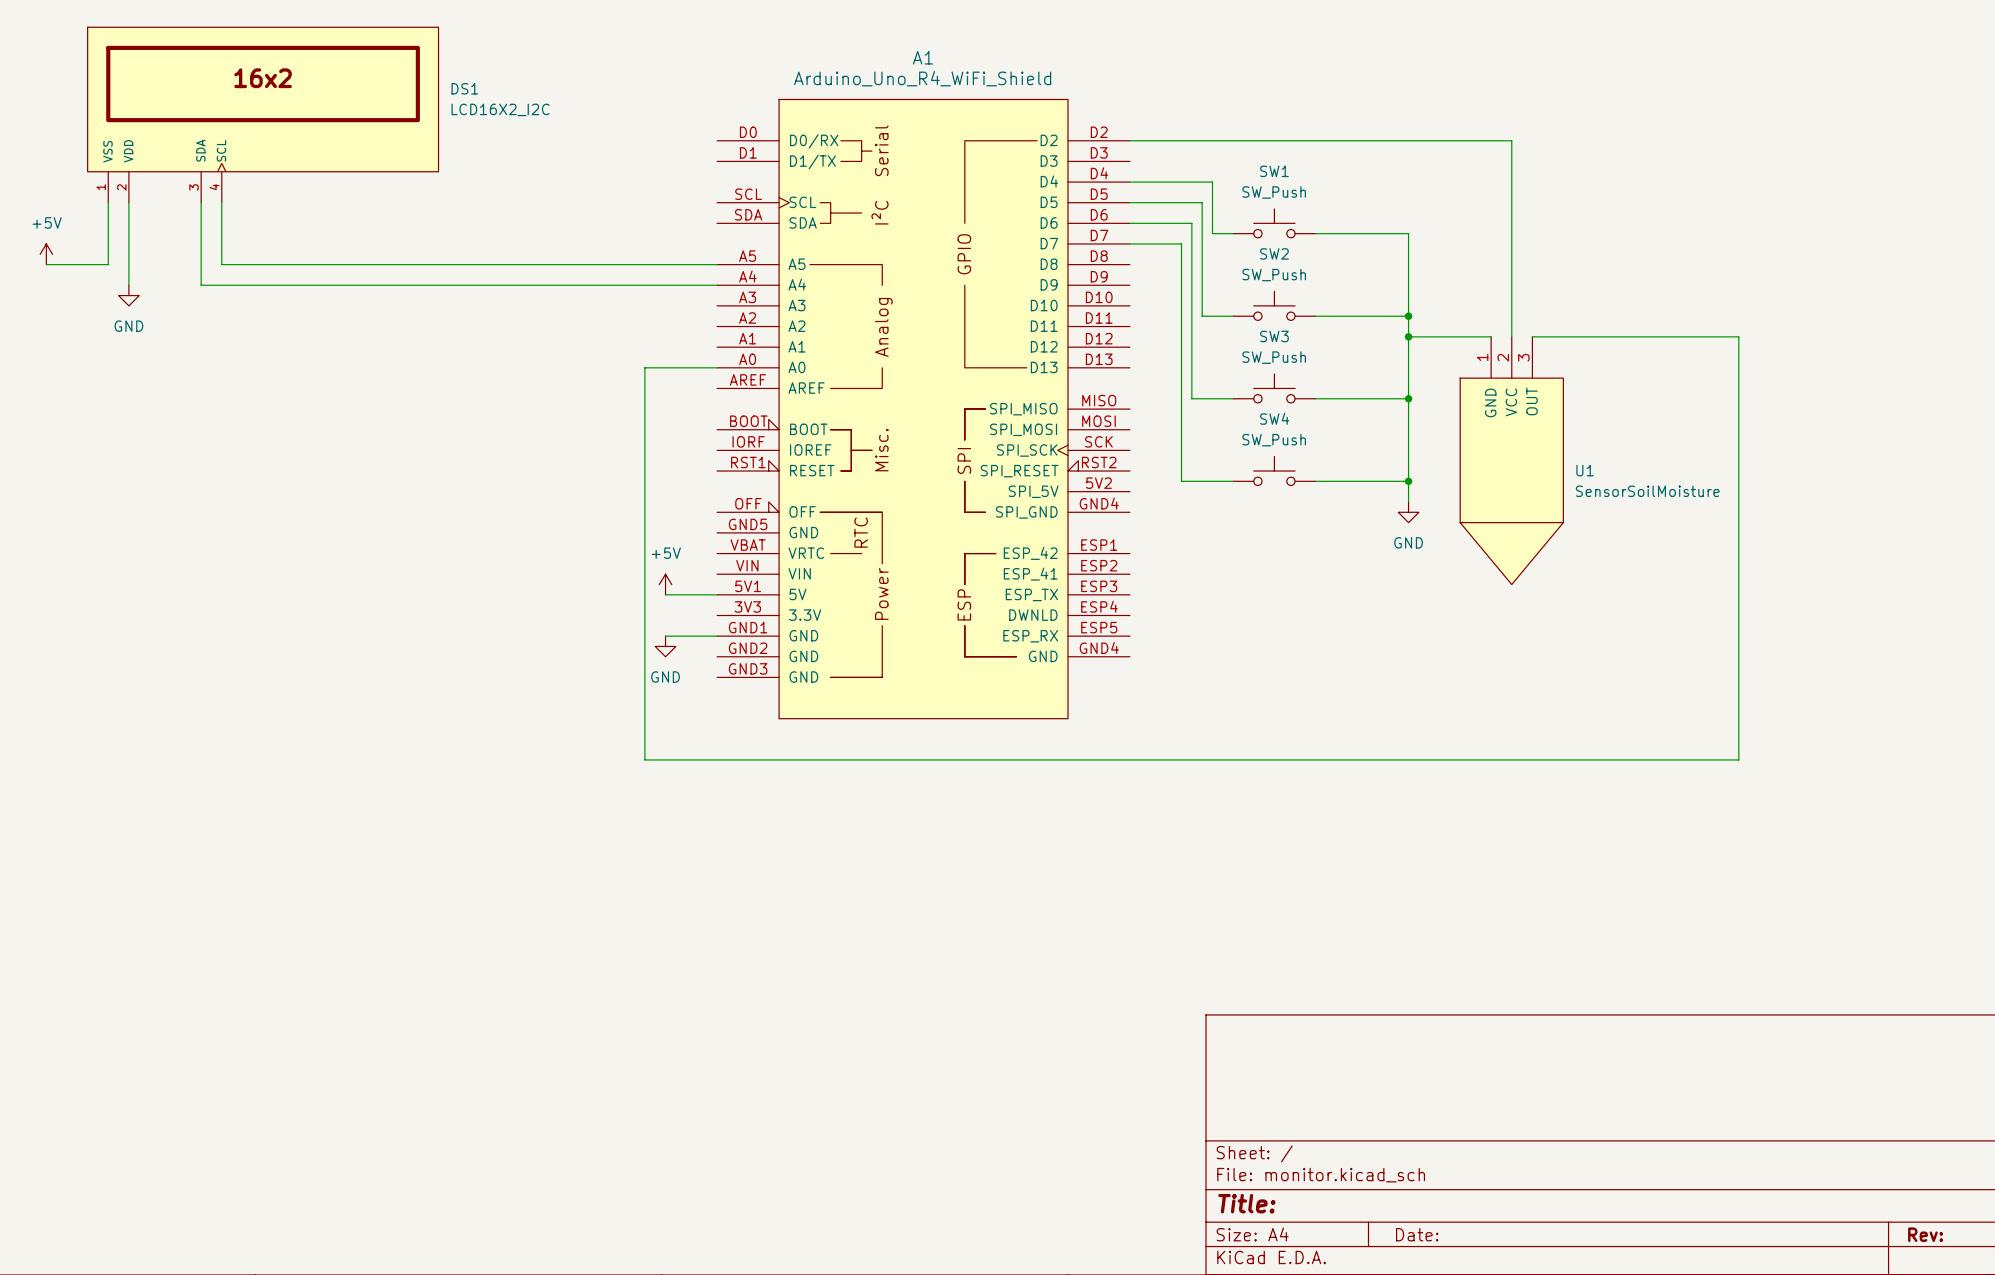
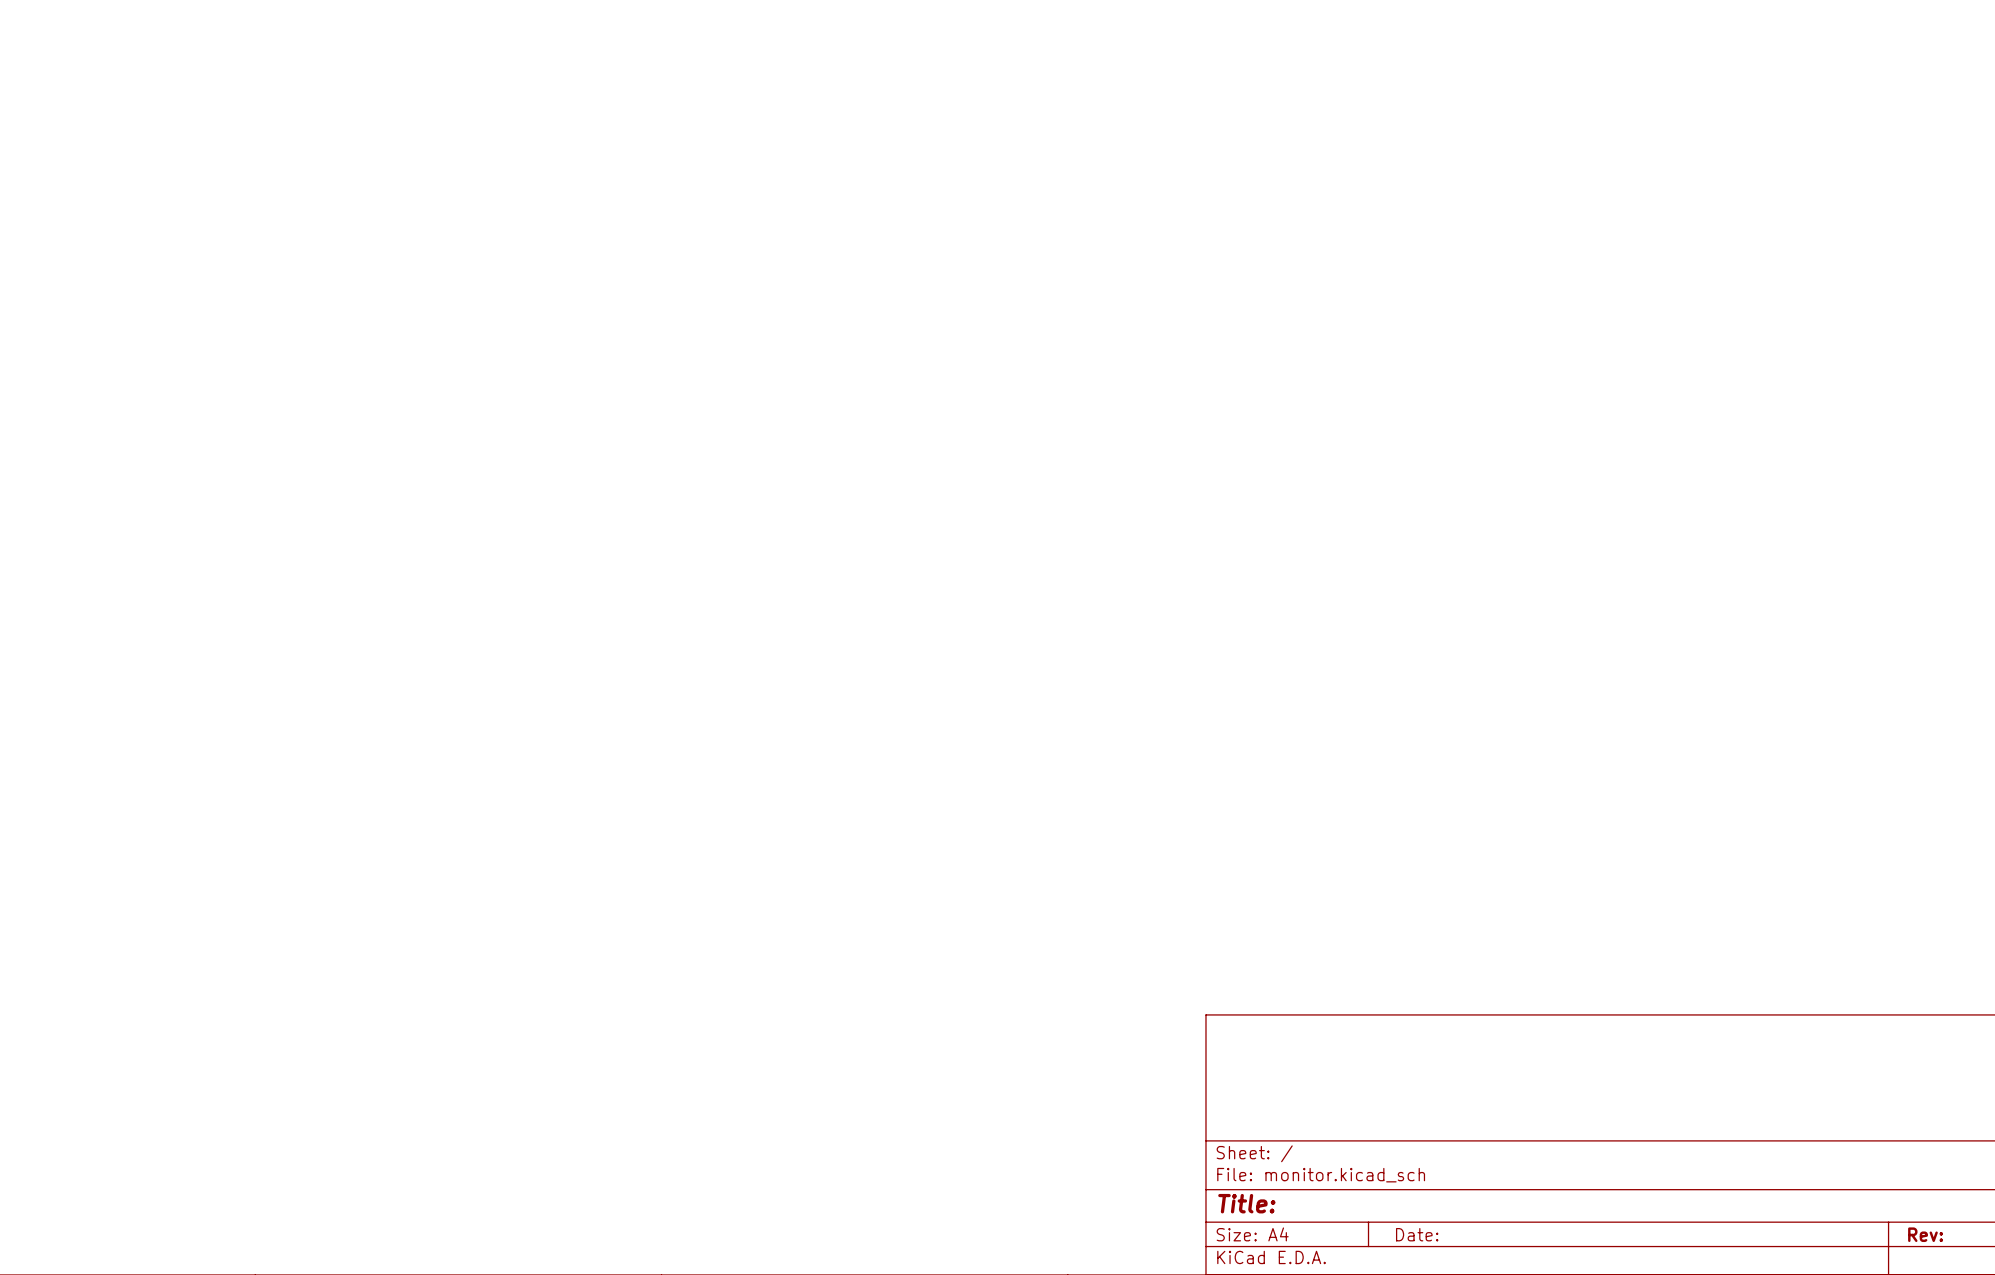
DS1: LCD16X2_I2C (263, 114) -> none
wire: (1129, 140) (1511, 140) (1511, 336) -> none
wire: (1129, 182) (1212, 182) (1212, 233) (1233, 233) -> none
wire: (108, 202) (108, 264) (46, 264) -> none
wire: (128, 202) (128, 285) -> none
wire: (201, 202) (201, 285) (717, 285) -> none
wire: (221, 202) (221, 264) (717, 264) -> none
wire: (1129, 202) (1202, 202) (1202, 316) (1233, 316) -> none
wire: (1129, 223) (1191, 223) (1191, 398) (1233, 398) -> none
SW1: SW_Push (1274, 223) -> none
wire: (1315, 233) (1408, 233) (1408, 501) -> none
wire: (1129, 243) (1181, 243) (1181, 481) (1233, 481) -> none
power symbol: +5V (46, 254) -> none
power symbol: GND (128, 295) -> none
SW2: SW_Push (1274, 305) -> none
wire: (1315, 316) (1408, 316) -> none
junction: (1408, 316) -> none
wire: (1408, 336) (1491, 336) -> none
junction: (1408, 336) -> none
wire: (1532, 336) (1738, 336) (1738, 759) (644, 759) (644, 367) (717, 367) -> none
SW3: SW_Push (1274, 388) -> none
wire: (1315, 398) (1408, 398) -> none
junction: (1408, 398) -> none
A1: Arduino_Uno_R4_WiFi_Shield (923, 409) -> none
U1: SensorSoilMoisture (1511, 460) -> none
SW4: SW_Push (1274, 471) -> none
wire: (1315, 481) (1408, 481) -> none
junction: (1408, 481) -> none
power symbol: GND (1408, 512) -> none
power symbol: +5V (665, 584) -> none
wire: (665, 594) (717, 594) -> none
wire: (665, 636) (717, 636) -> none
power symbol: GND (665, 646) -> none

